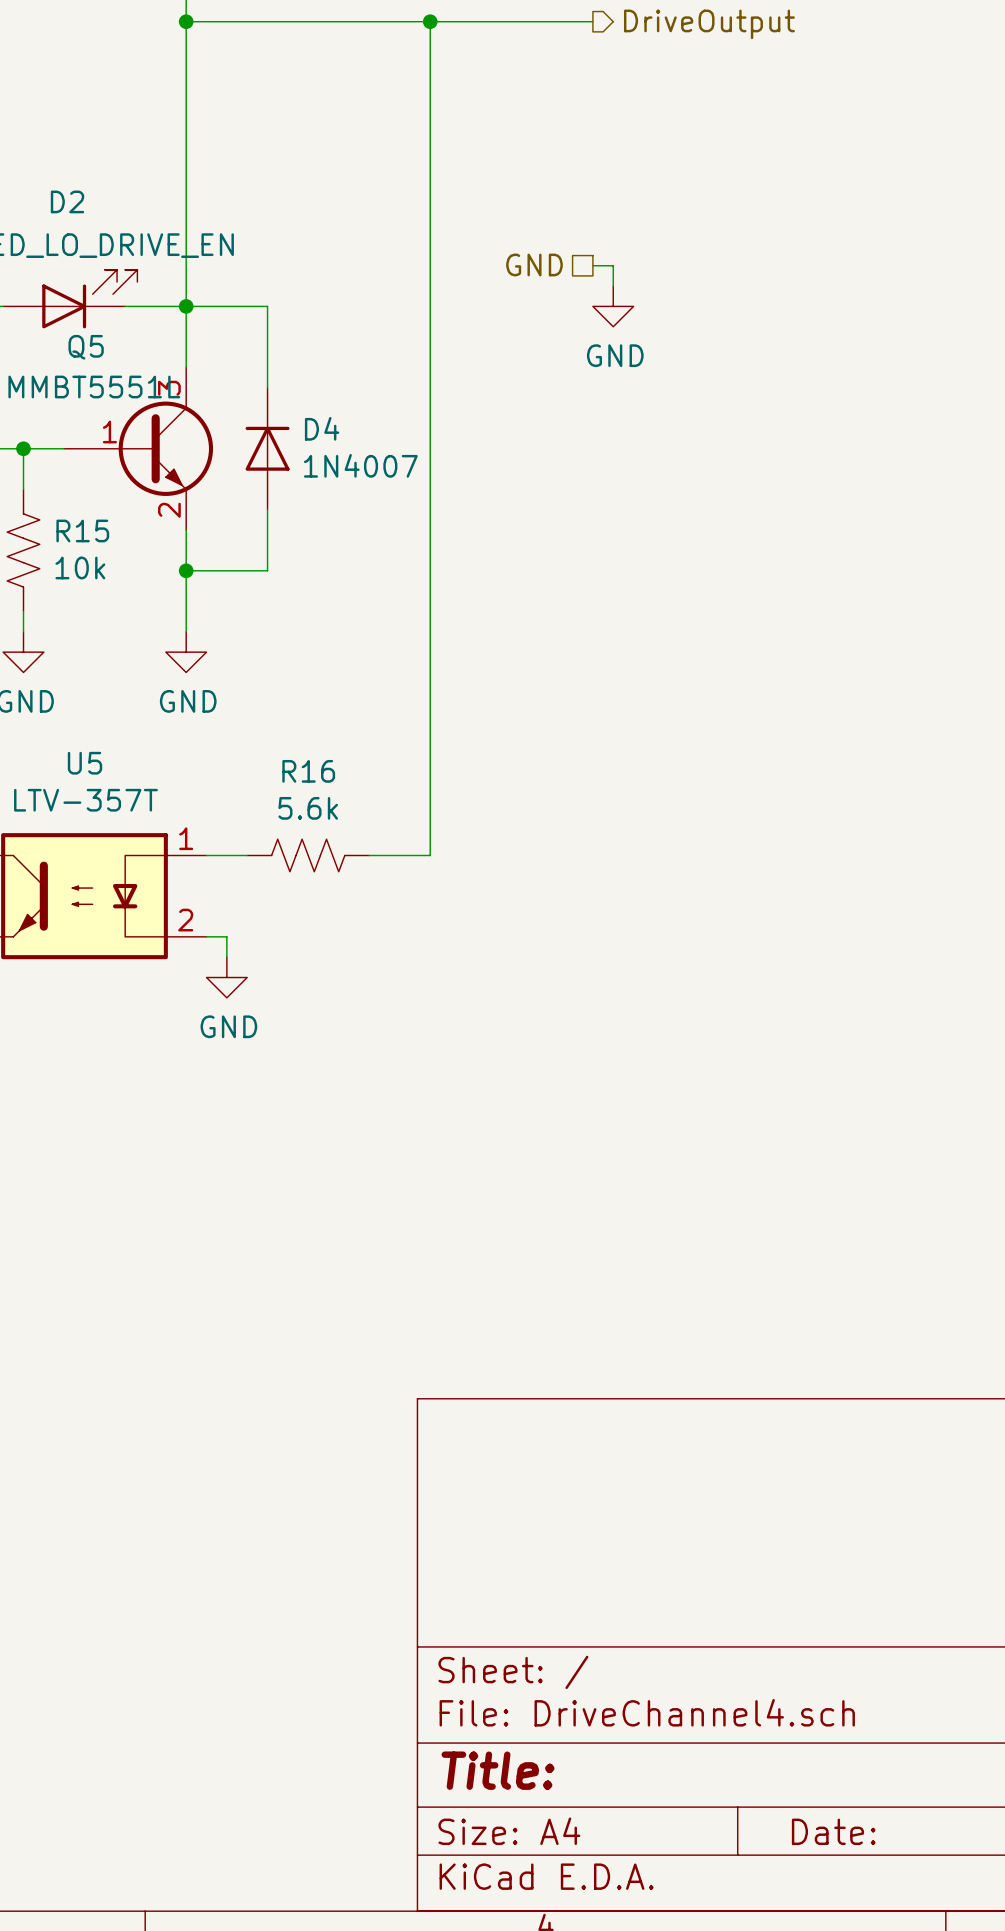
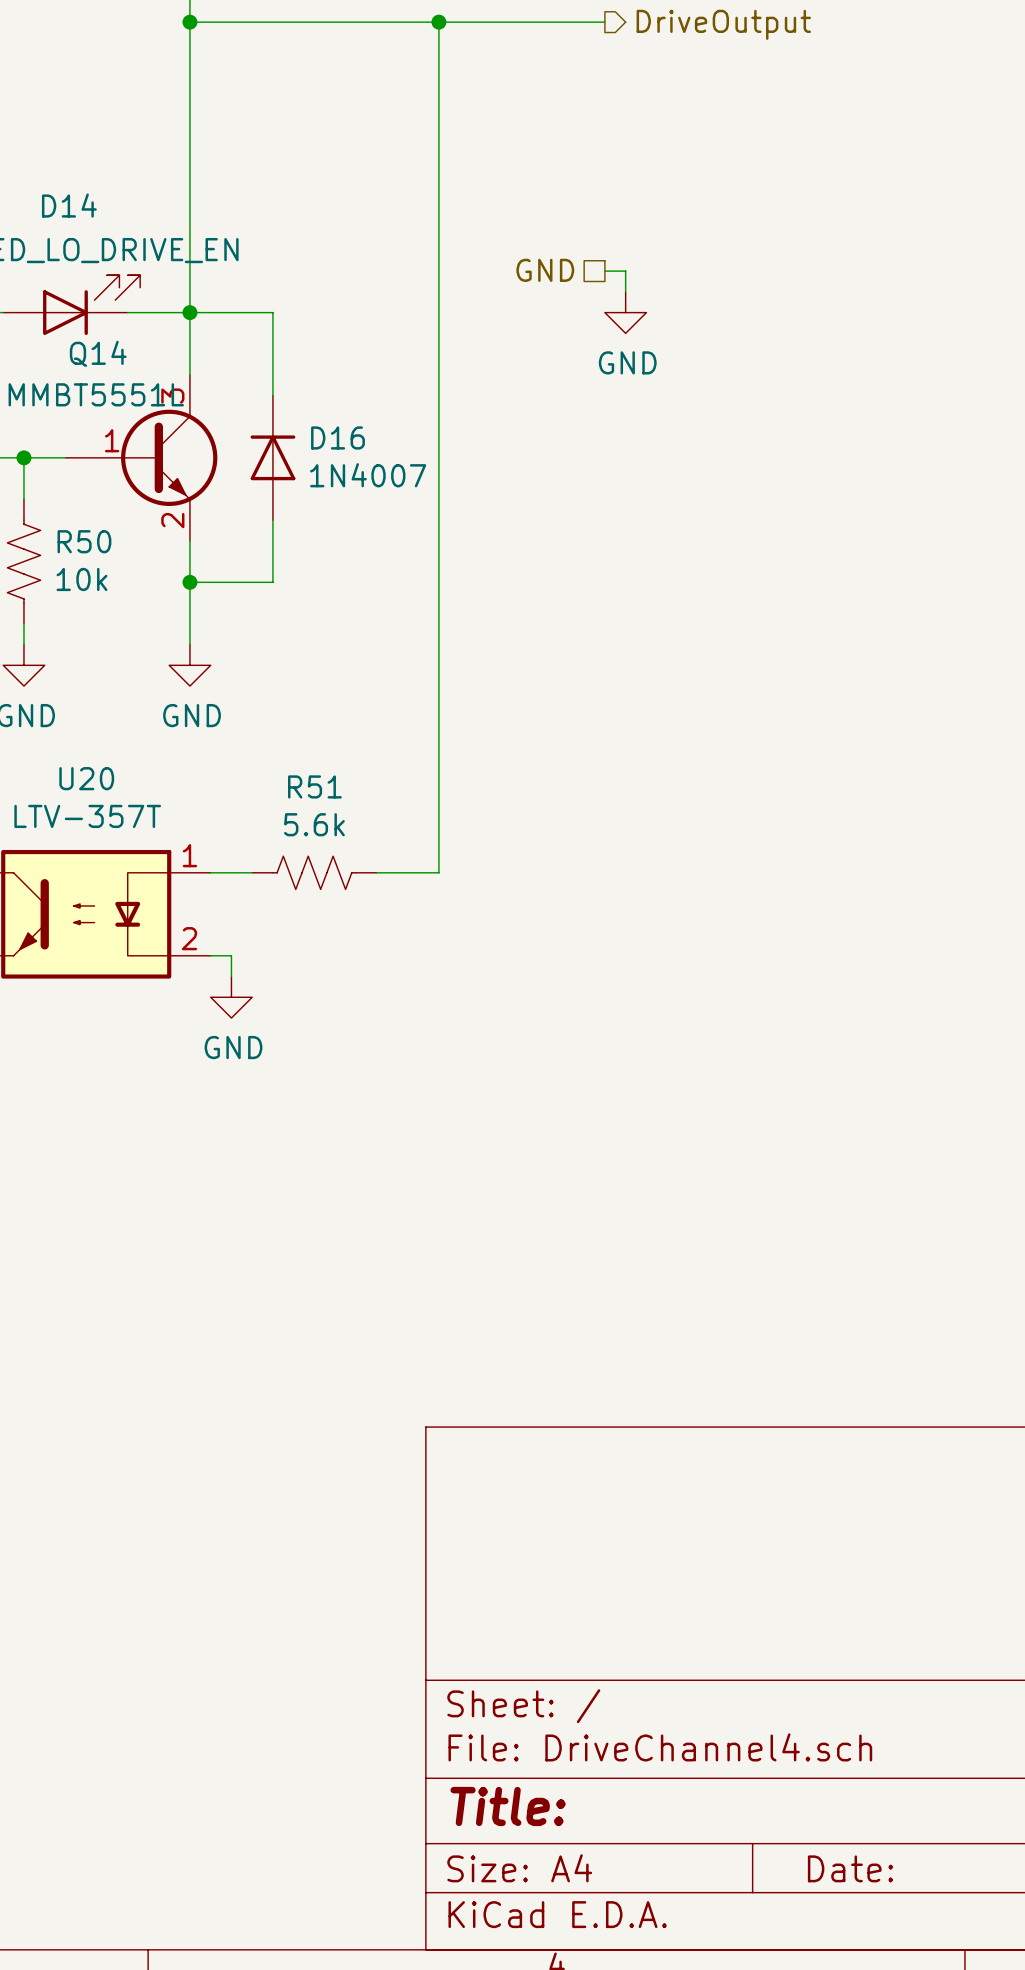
D2 name: D2 (67, 201) -> D14 (69, 205)
Q5 name: Q5 (86, 347) -> Q14 (98, 353)
D4 name: D4 (322, 428) -> D16 (337, 437)
R15 name: R15 (82, 530) -> R50 (84, 541)
U5 name: U5 (84, 763) -> U20 (86, 778)
R16 name: R16 (308, 771) -> R51 (314, 786)

